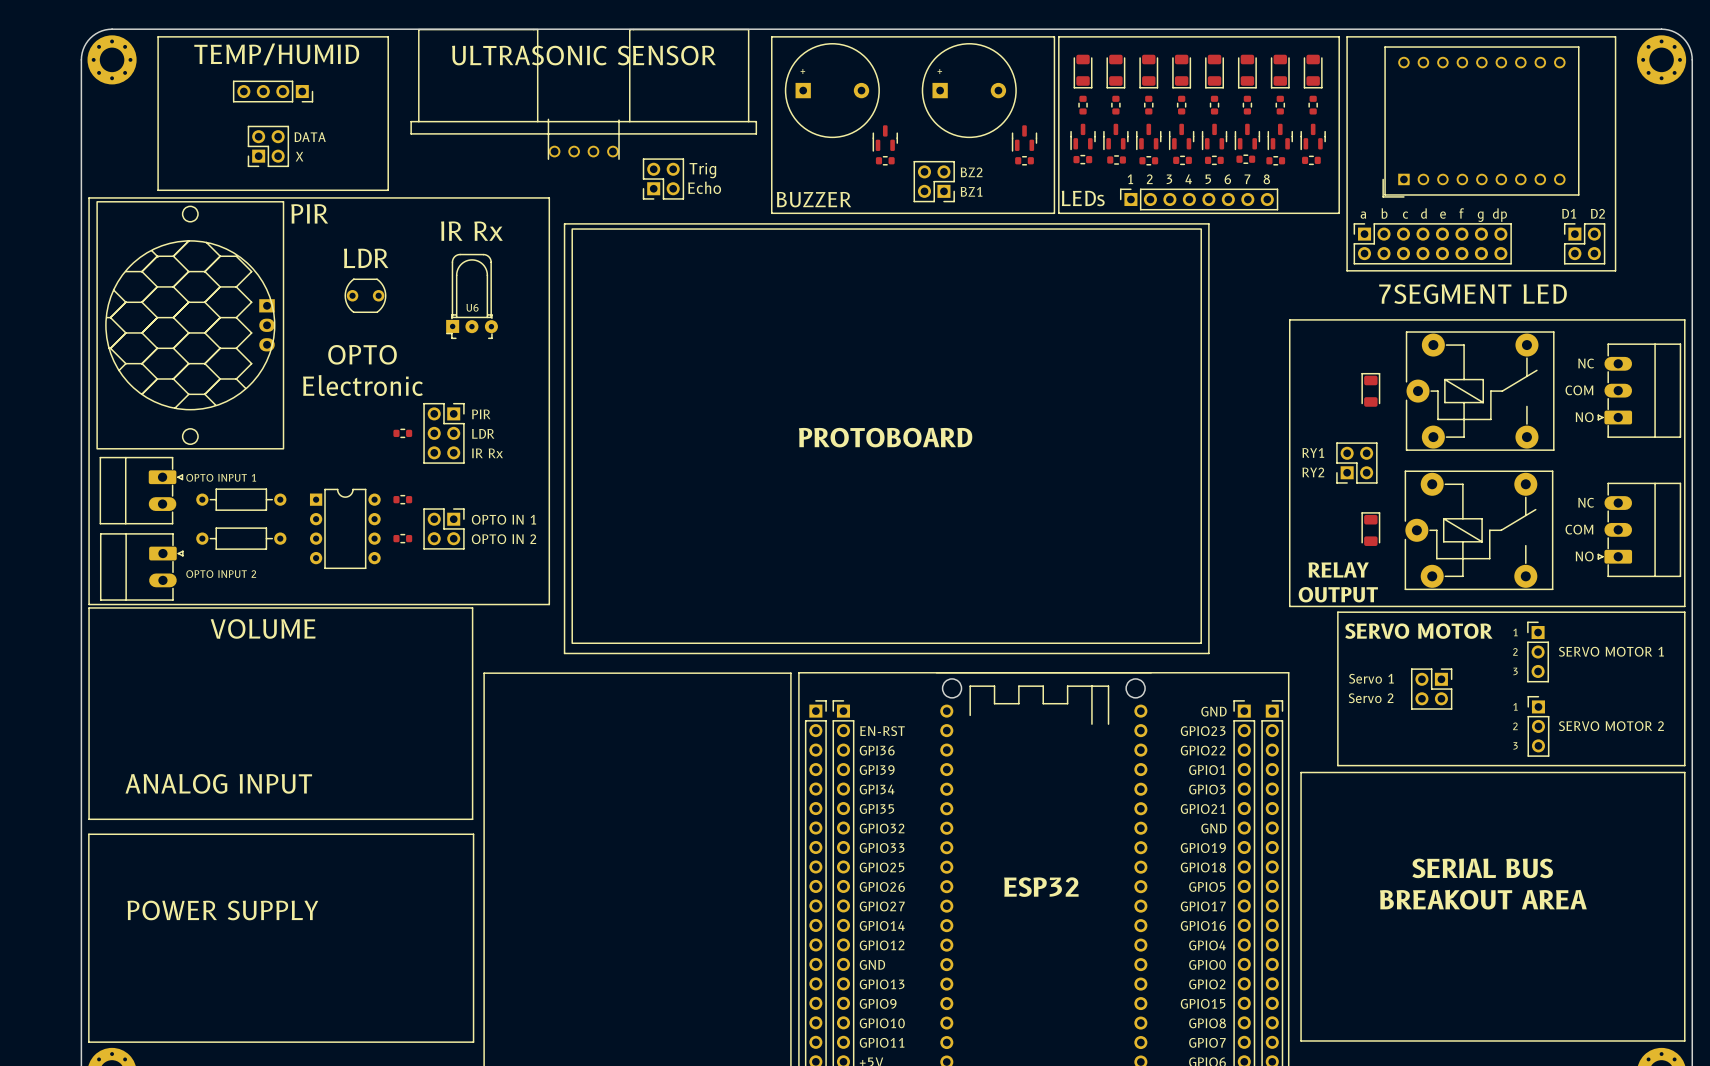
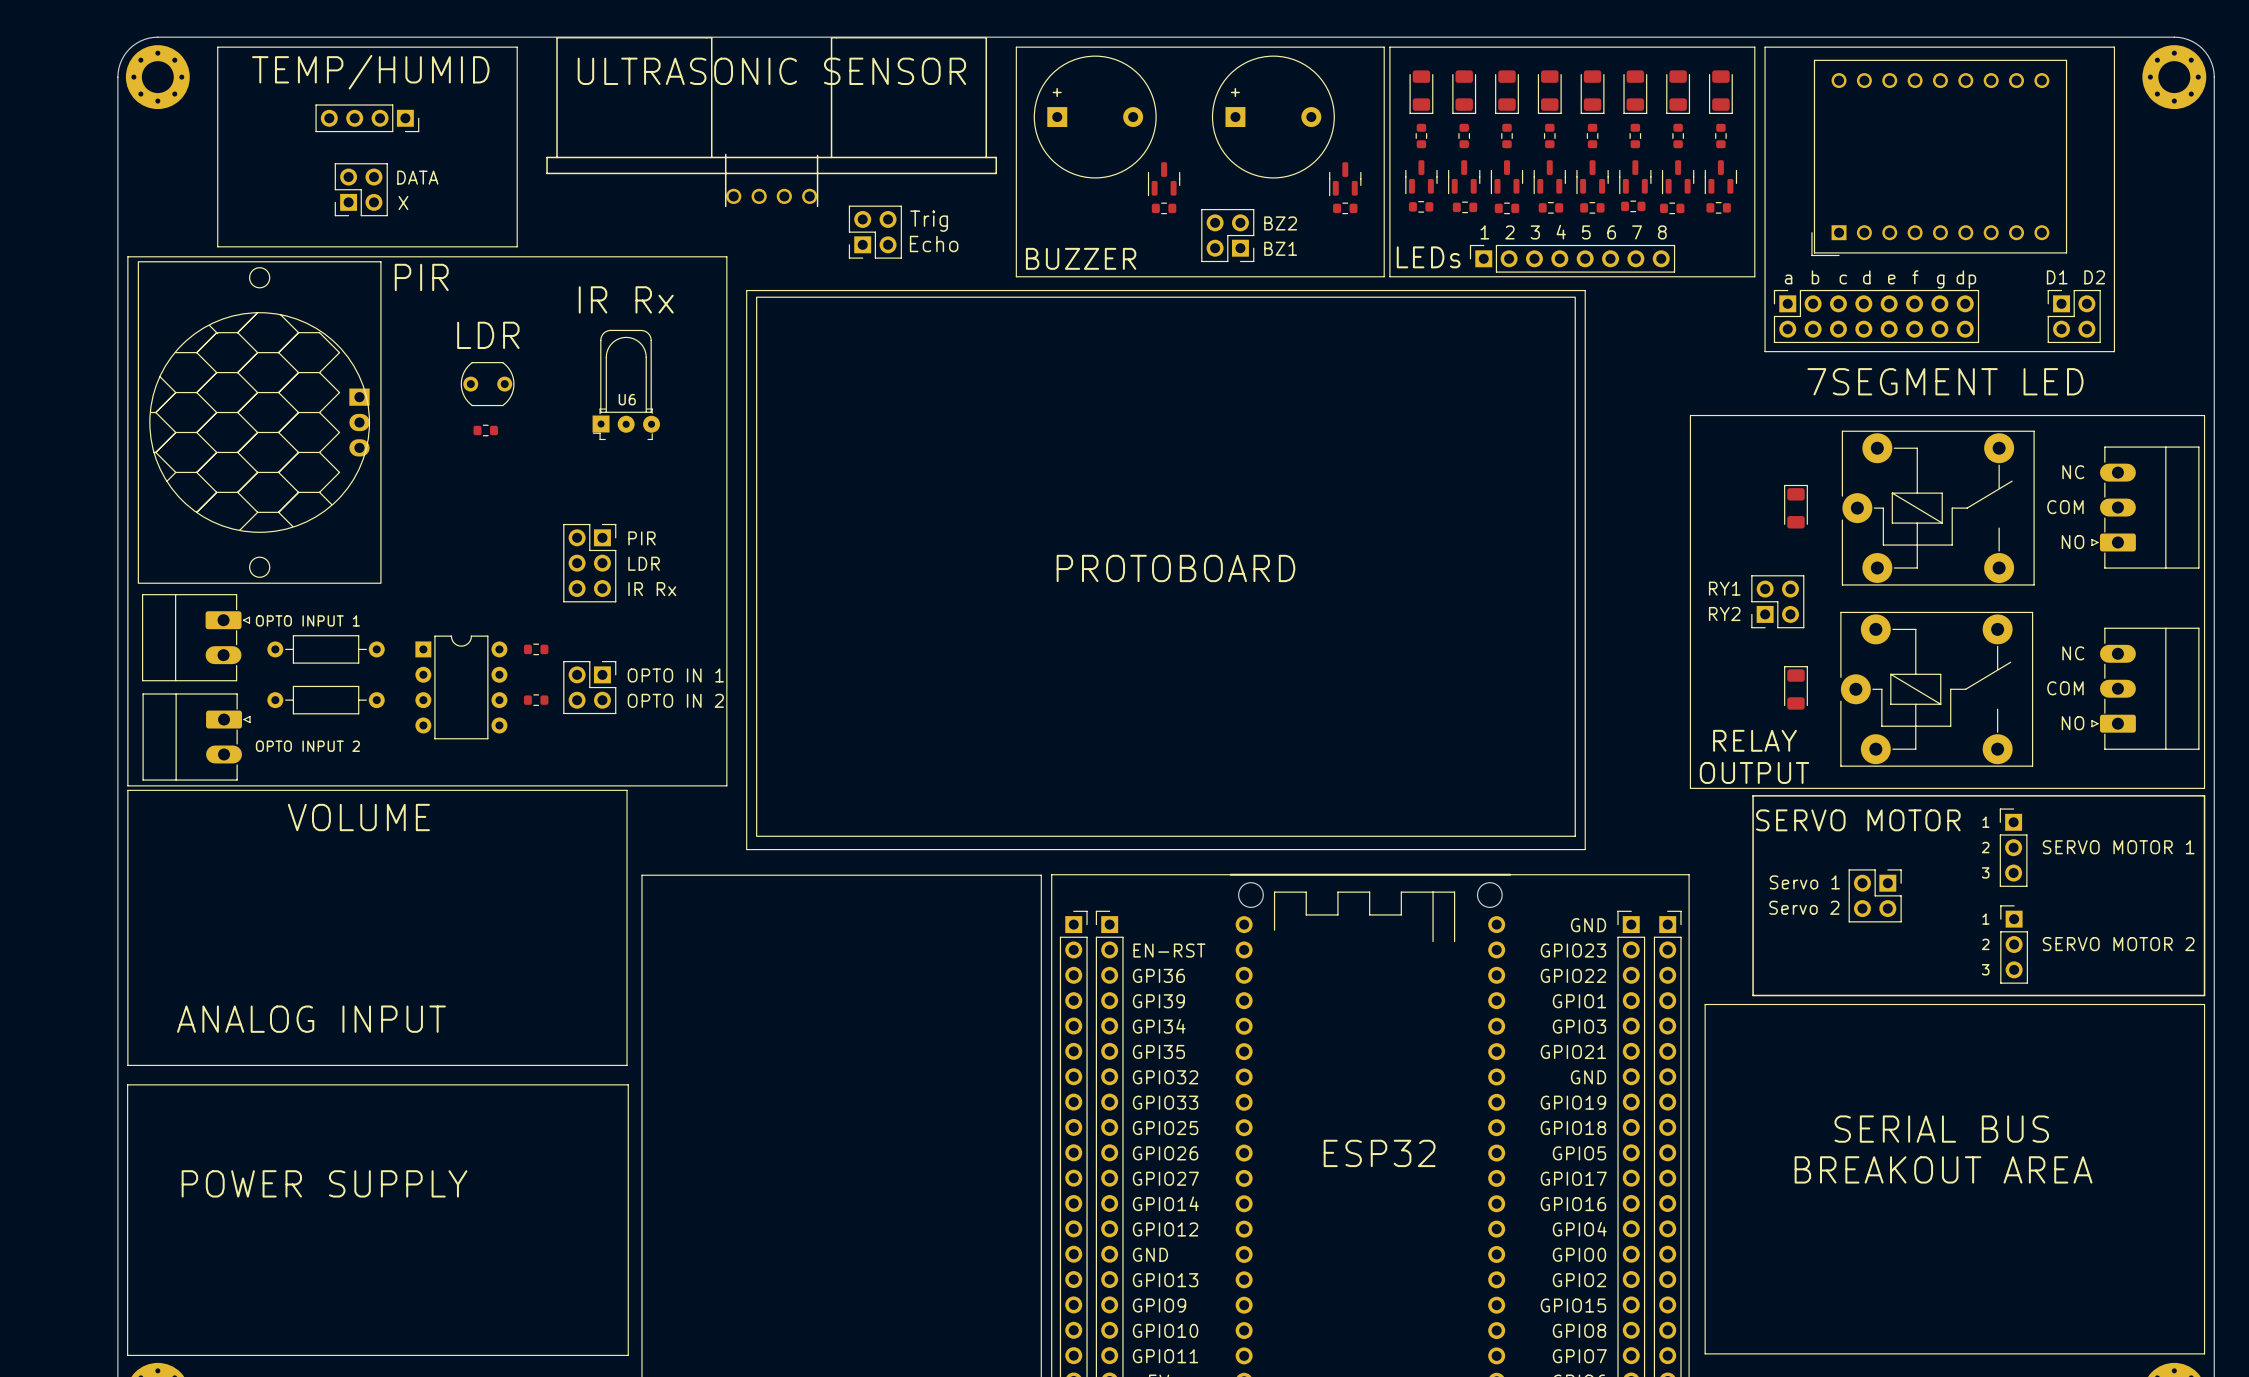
text: OPTO (362, 354) -> none
text: Electronic (362, 385) -> none
part position: (402, 433) -> (485, 430)

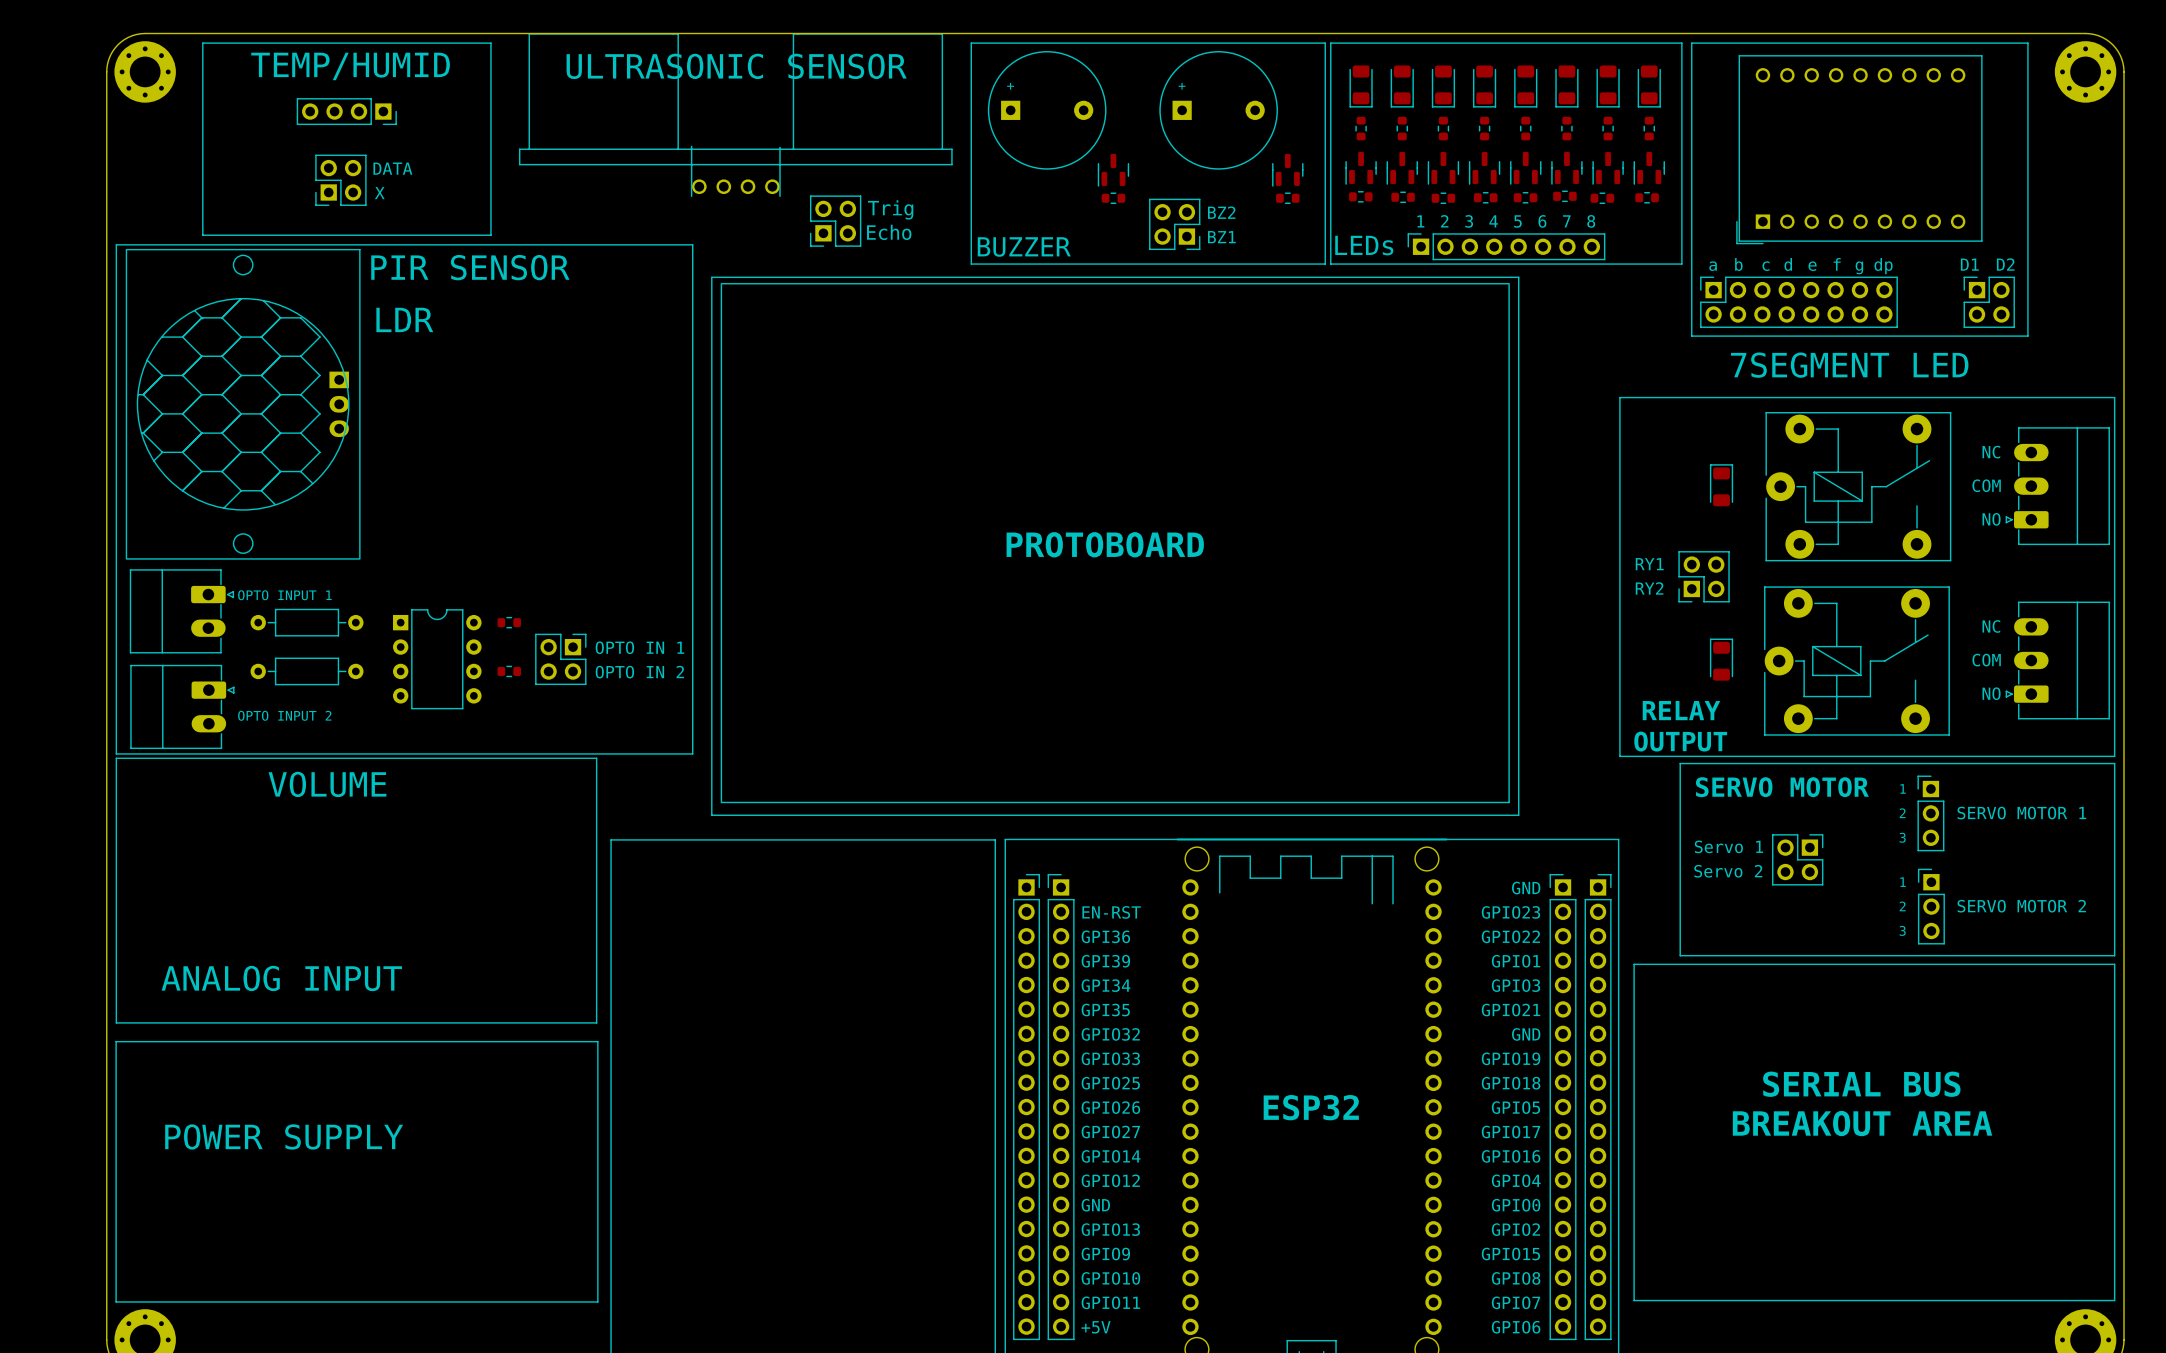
text: PIR (421, 277) -> PIR SENSOR (470, 267)
text: IR Rx (626, 299) -> none
text position: LDR (488, 335) -> LDR (404, 319)
part: (487, 383) -> none
U6: (626, 384) -> none
part: (485, 430) -> none
text: PIR (642, 538) -> none
part: (589, 563) -> none
text: LDR (644, 563) -> none
text: IR Rx (652, 589) -> none

